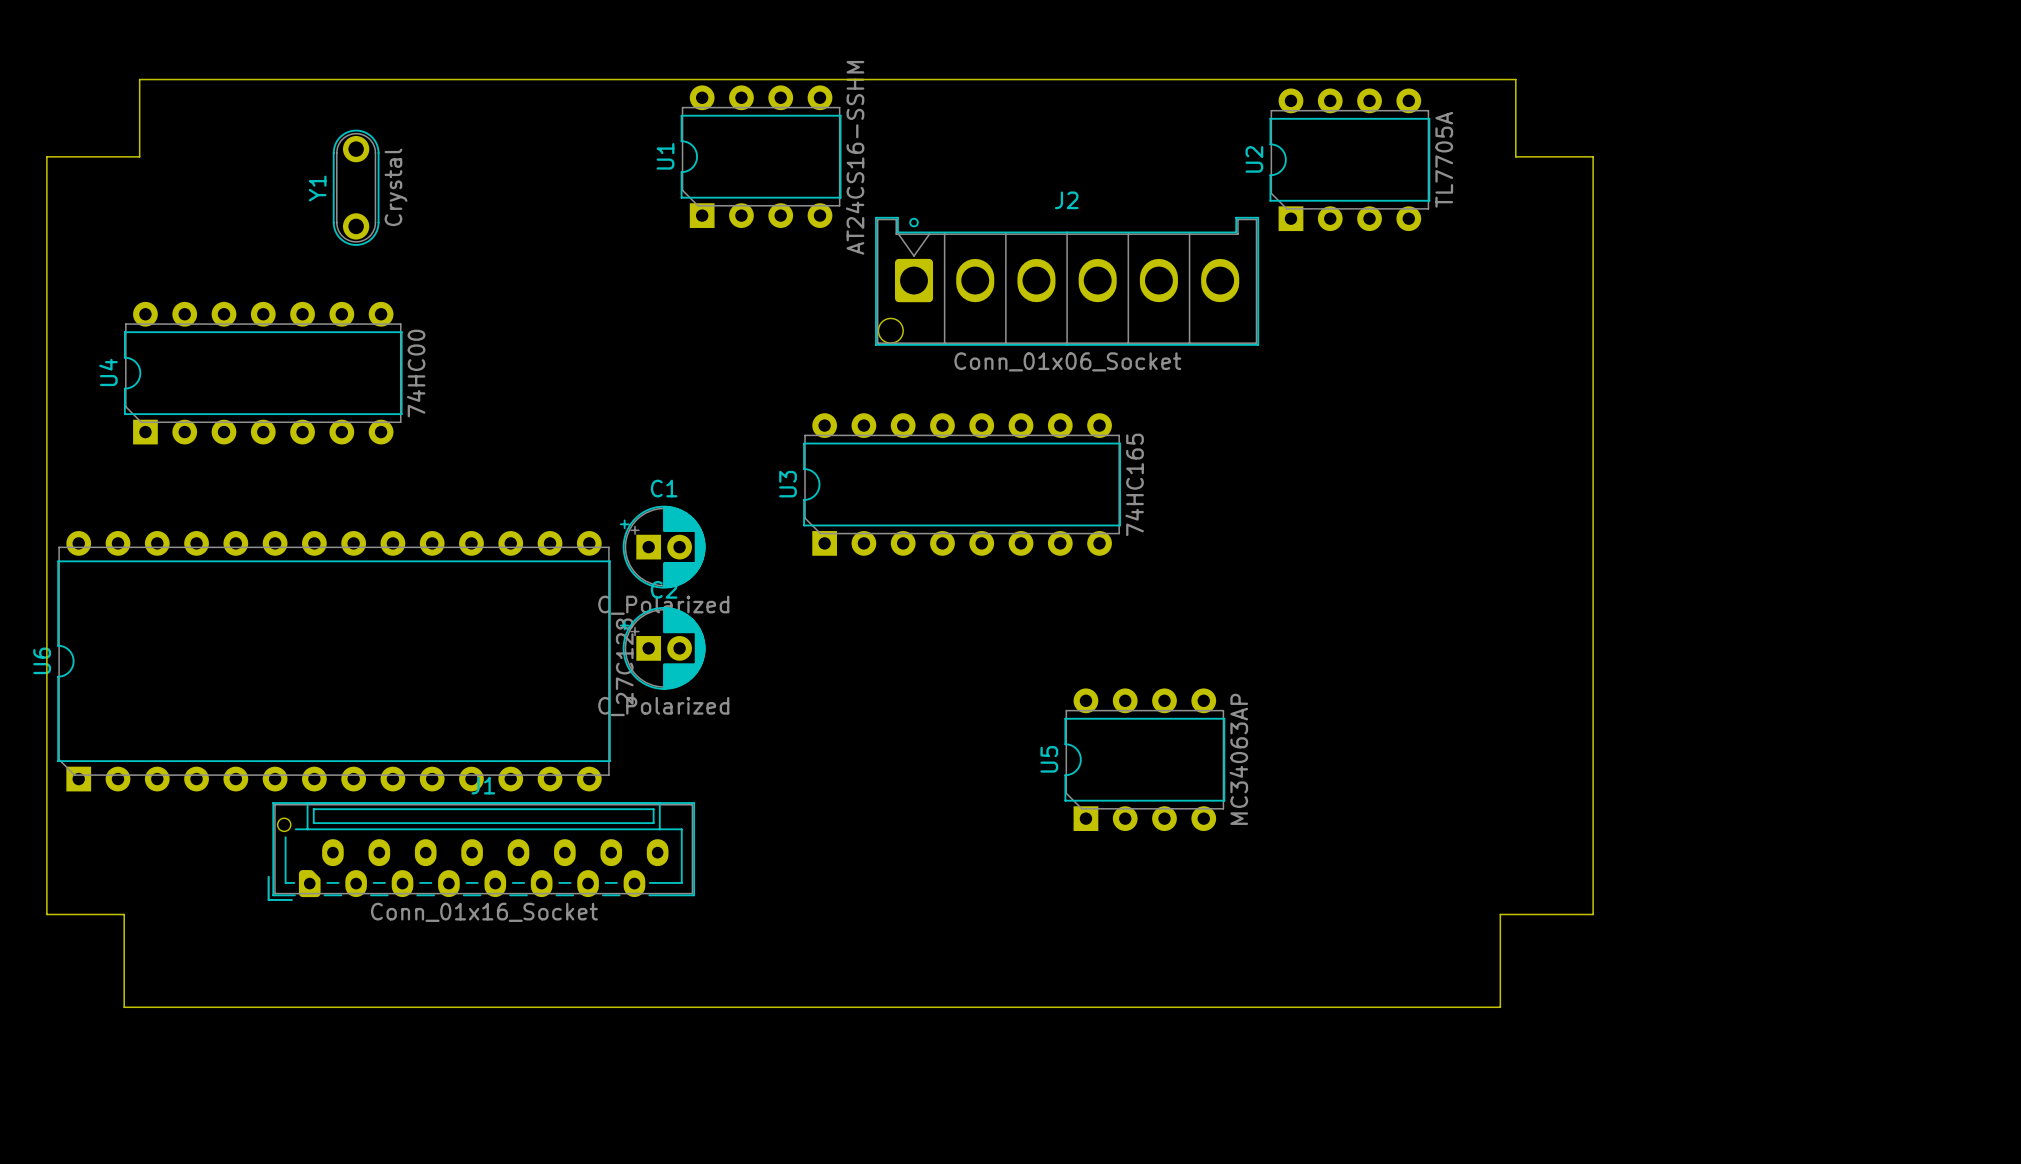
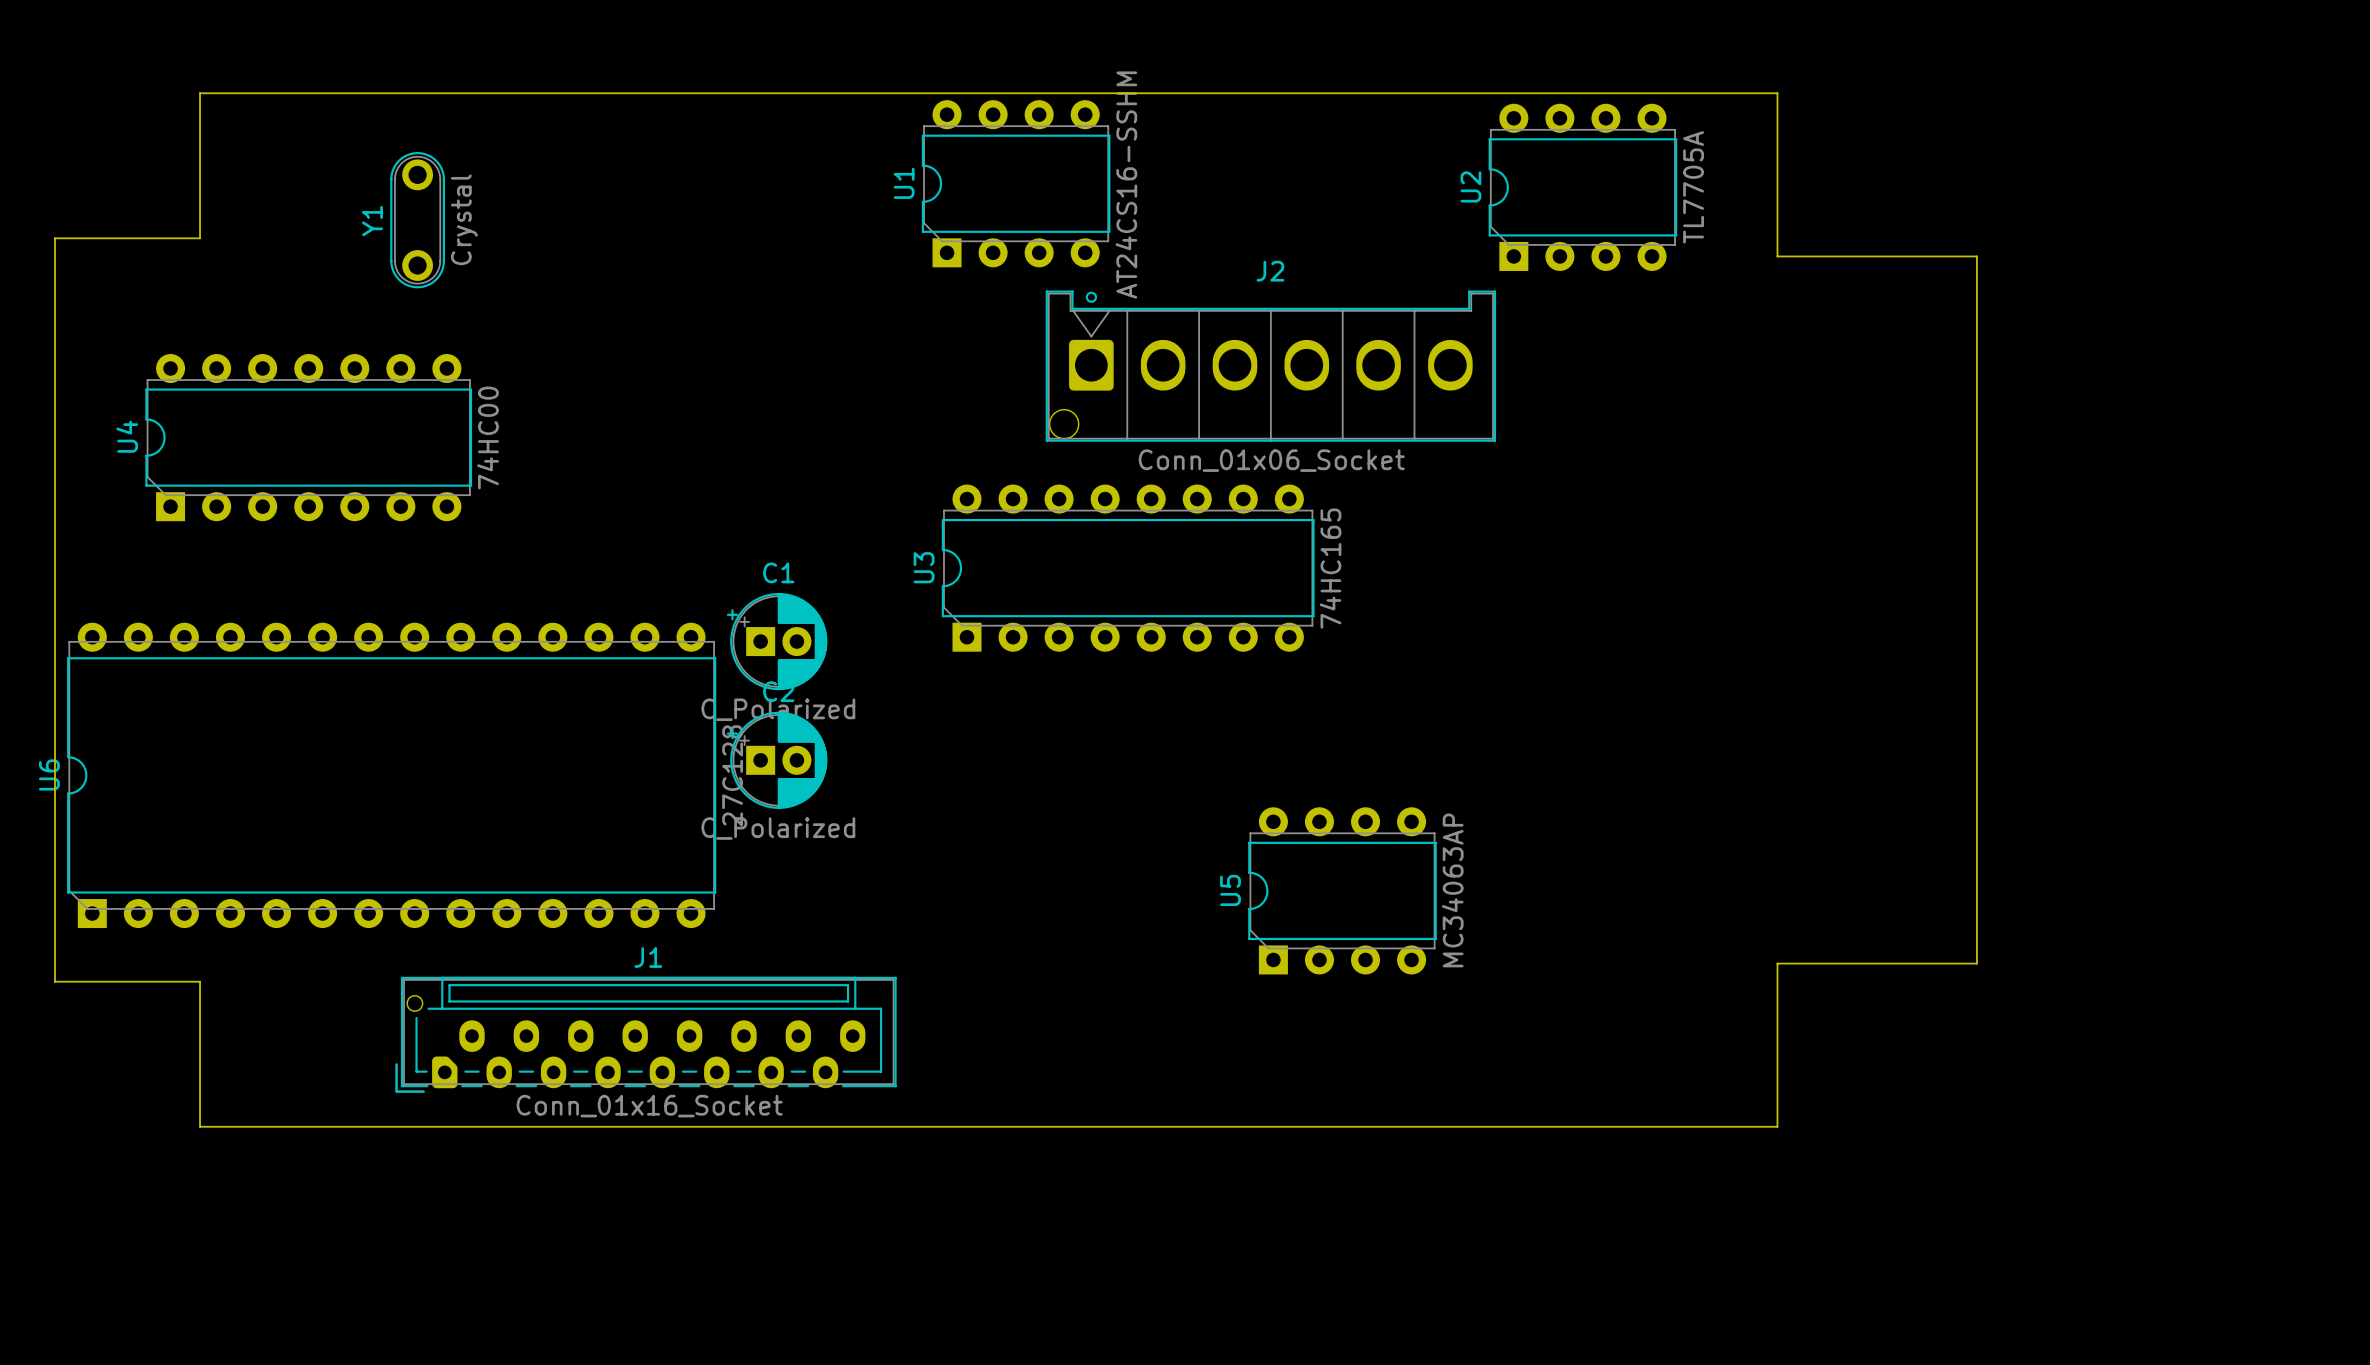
board edge: (170, 79) (139, 79) (139, 156) (46, 156) (46, 203) -> (200, 93) (200, 238) (54, 238)
U1 position: (761, 156) -> (1016, 183)
board edge: (1515, 156) (1593, 156) (1593, 914) (1500, 914) (1500, 1007) (124, 1007) (124, 914) (46, 914) (46, 837) -> (1777, 183) (1777, 256) (1976, 256) (1976, 963) (1777, 963) (1777, 1126) (200, 1126) (200, 981) (54, 981)
J2 position: (1067, 281) -> (1270, 366)
J1 position: (481, 851) -> (646, 1034)

